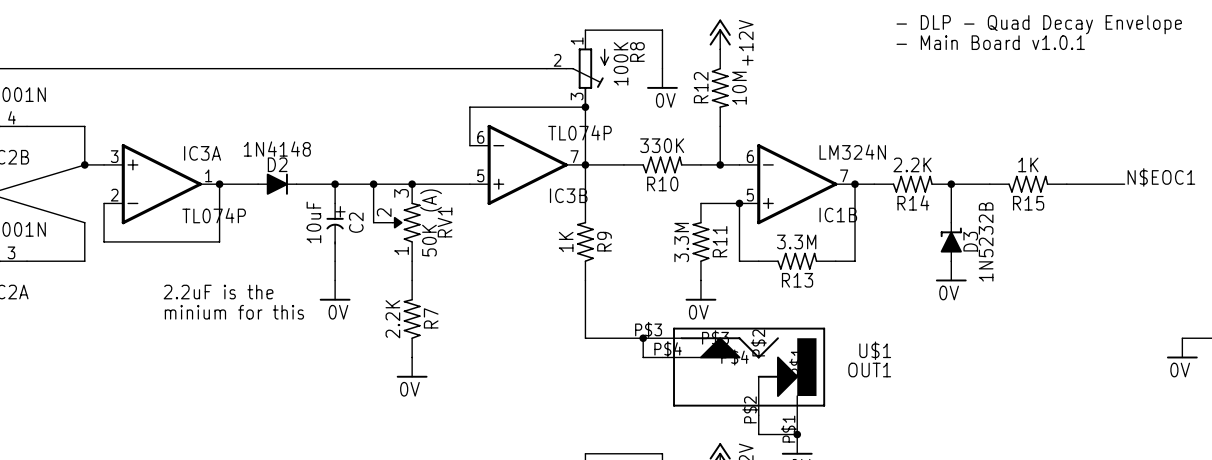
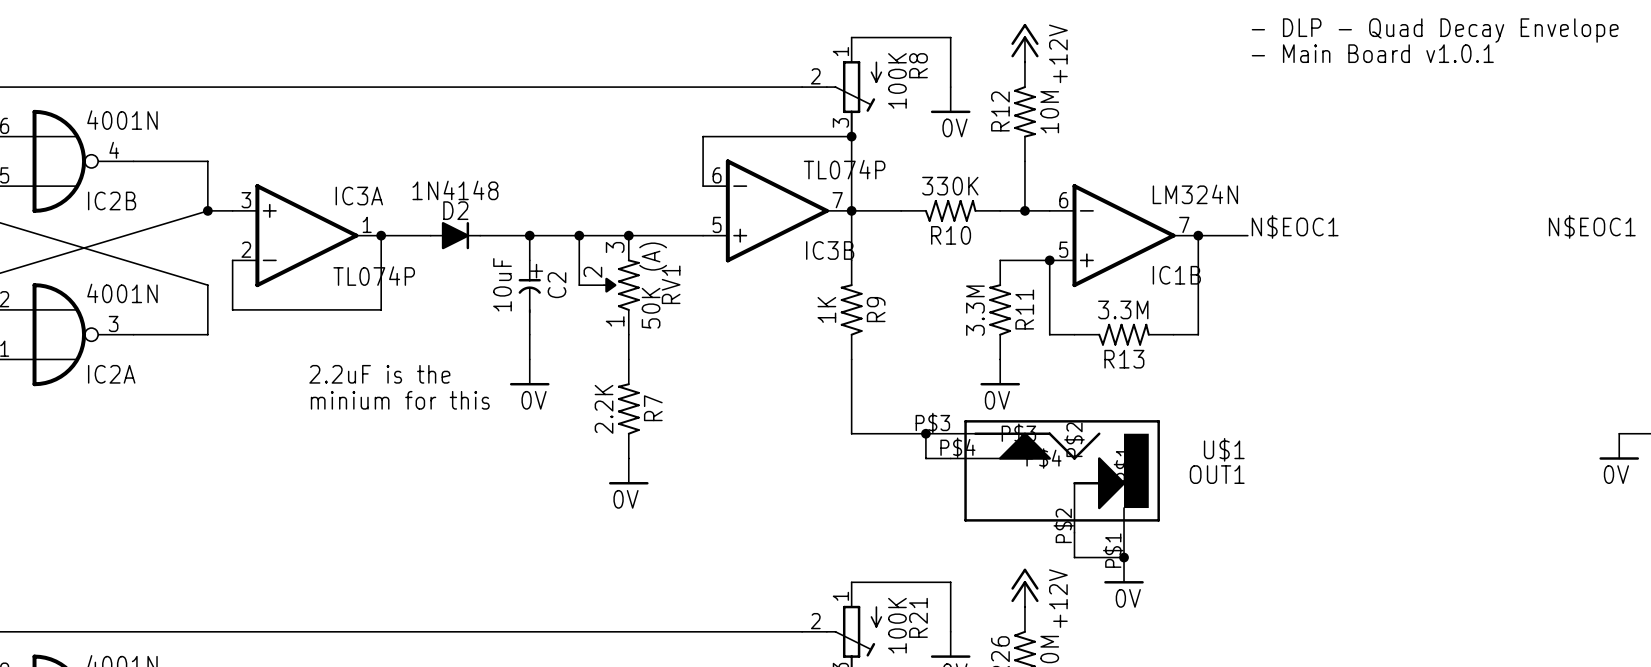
label: none -> N$EOC1 (1295, 226)
R14: 2.2K (912, 184) -> none
junction: (951, 184) -> none
wire: (989, 184) (951, 184) (951, 222) -> none
R15: 1K (1028, 184) -> none
wire: (1066, 184) (1124, 184) -> none
D3: 1N5232B (951, 241) -> none
power symbol: 0V (951, 271) -> none

